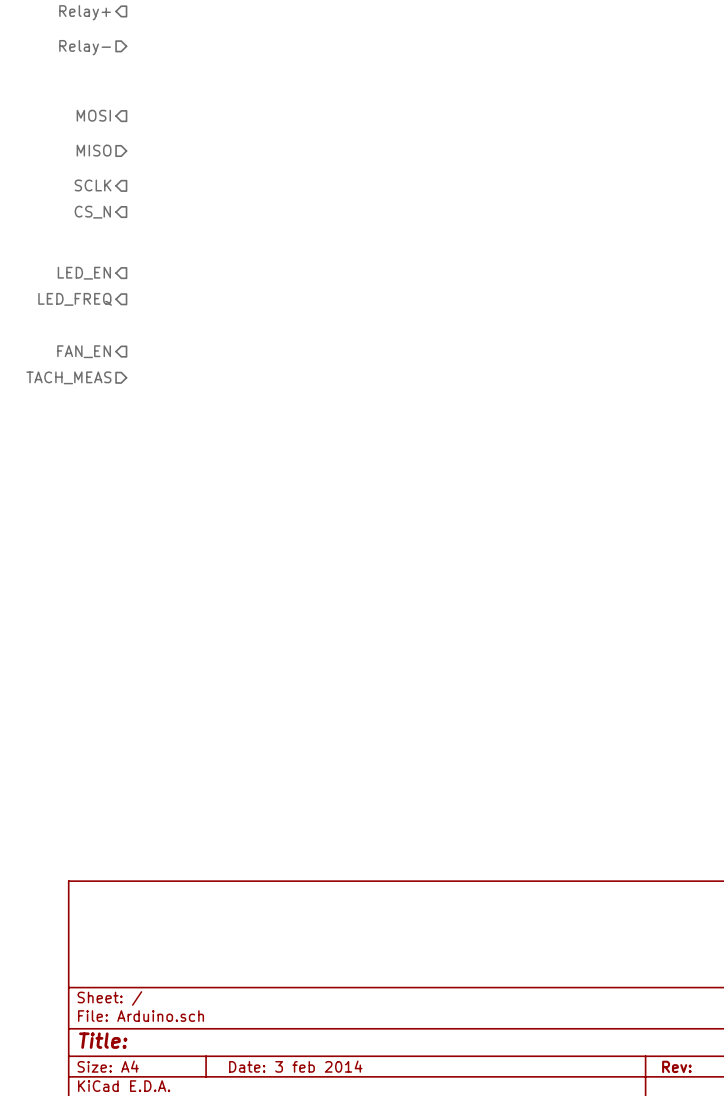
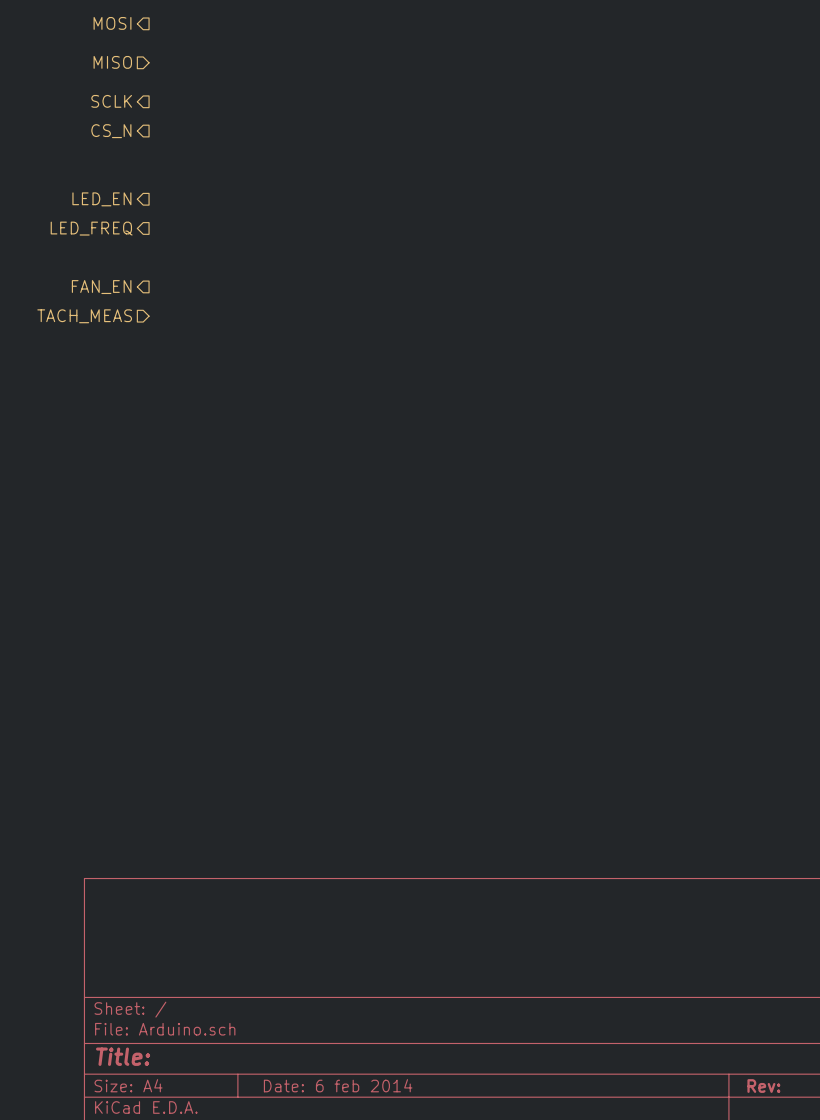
title block: Date: 3 feb 2014 (295, 1066) -> Date: 6 feb 2014 (338, 1085)

